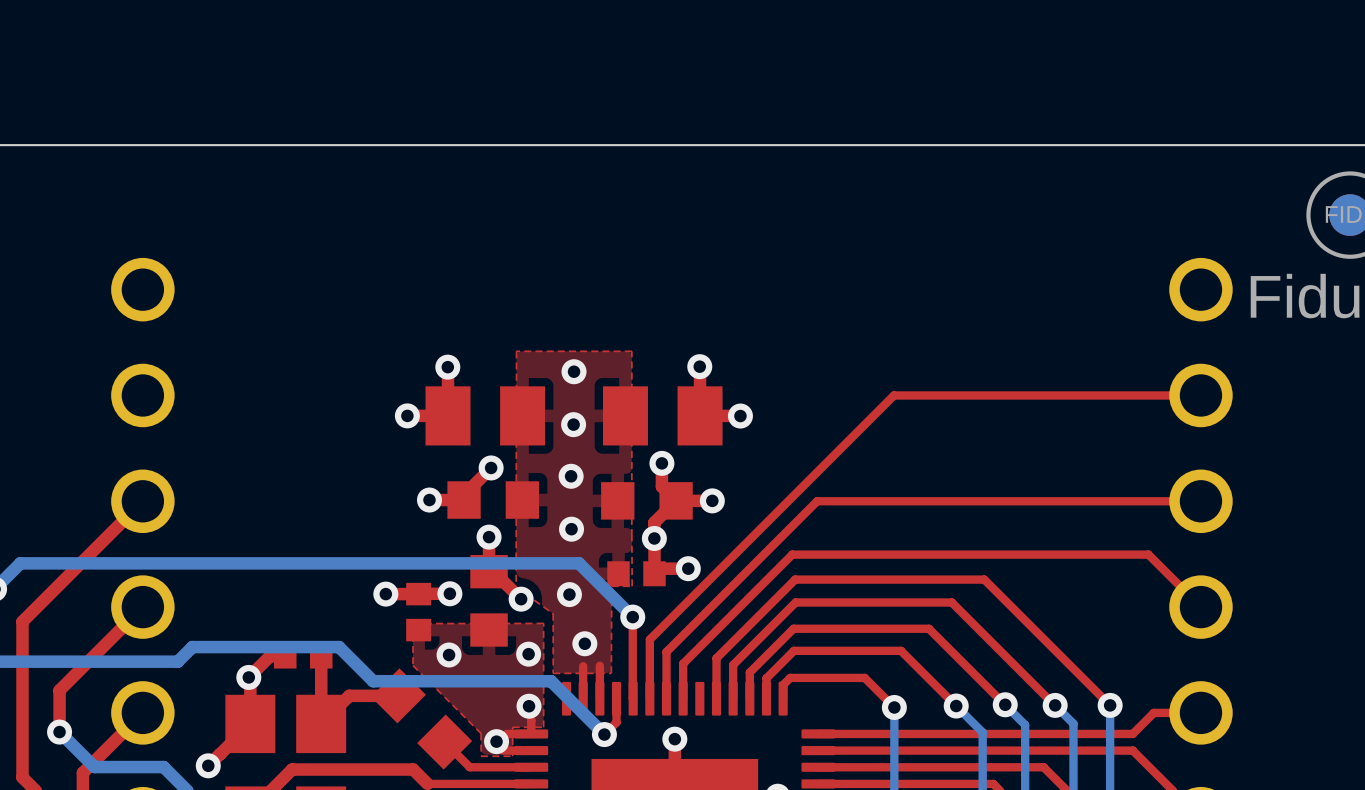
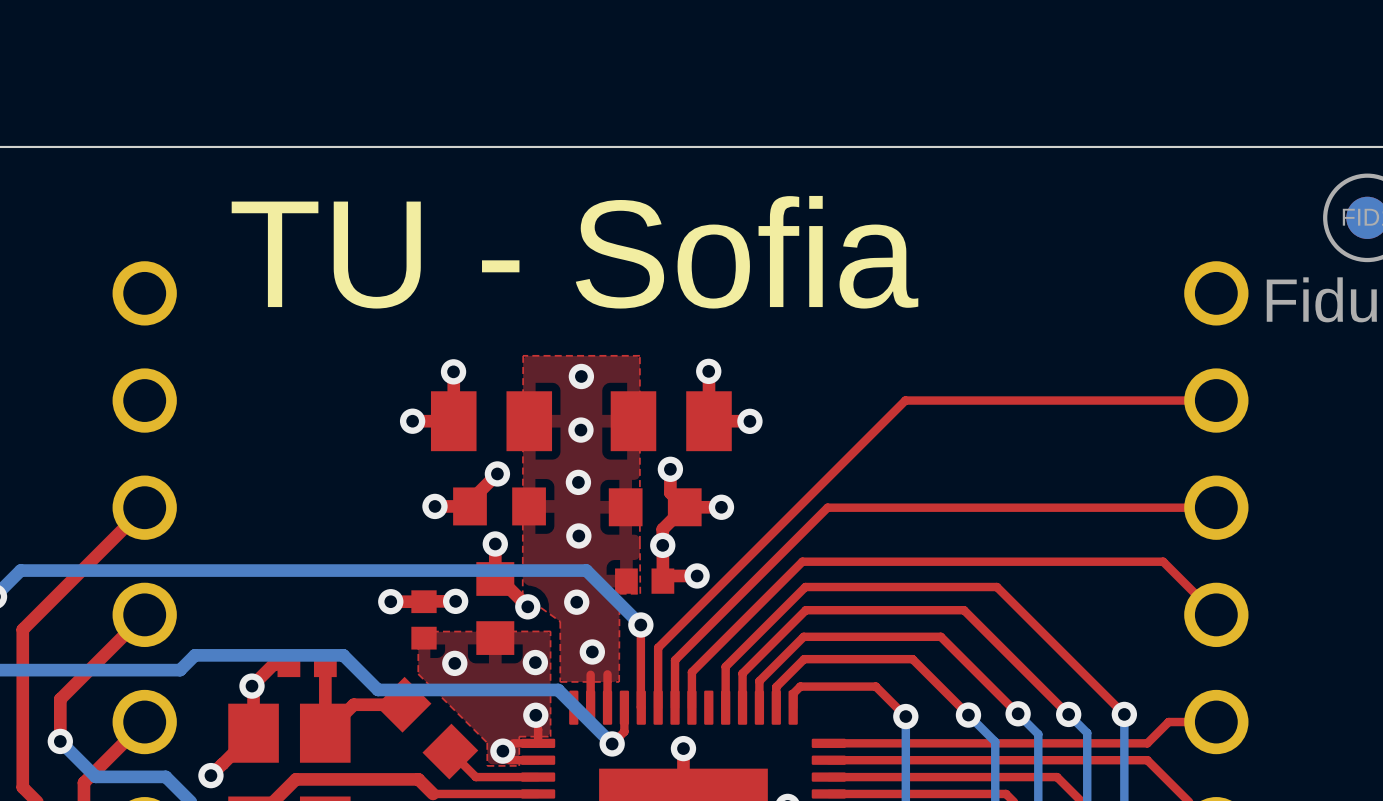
text: none -> TU - Sofia (574, 252)

